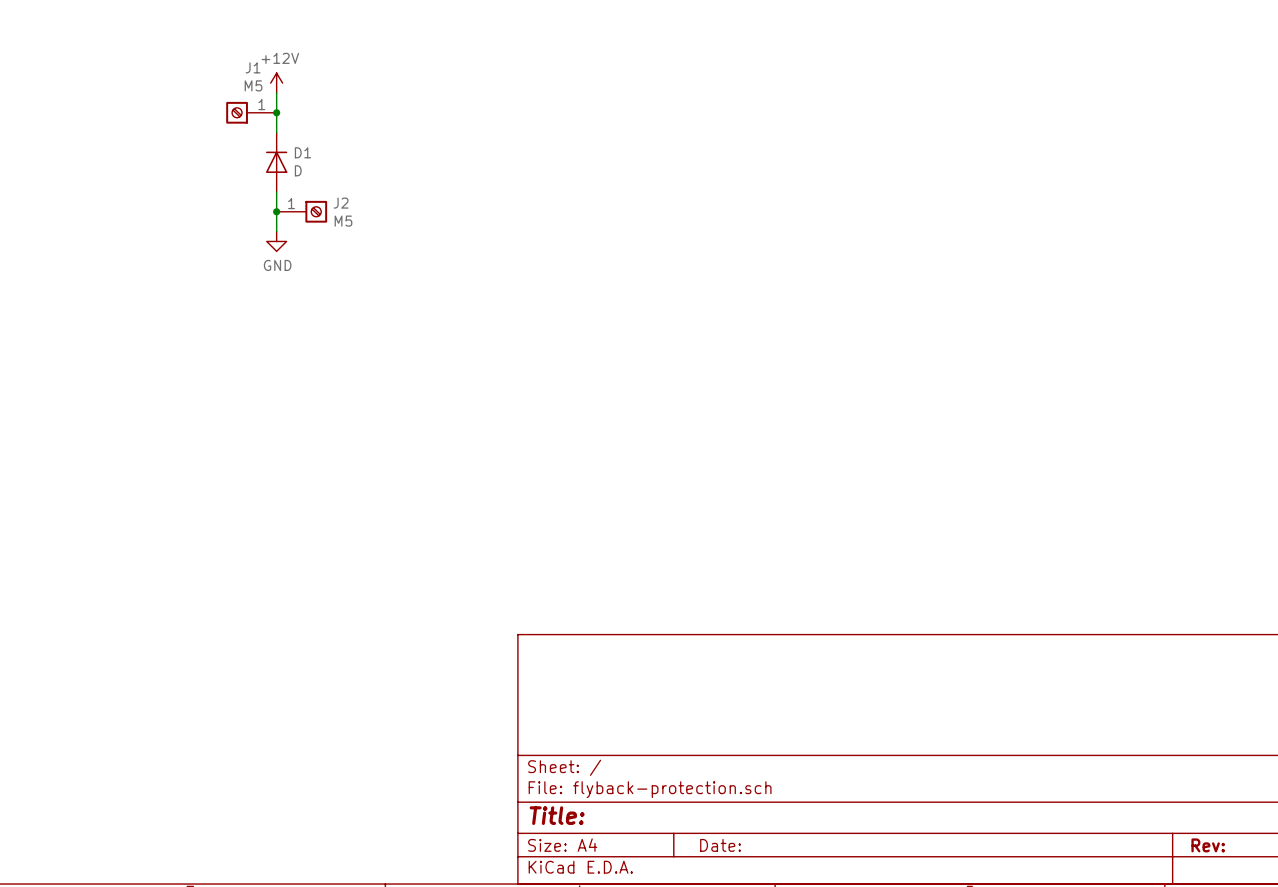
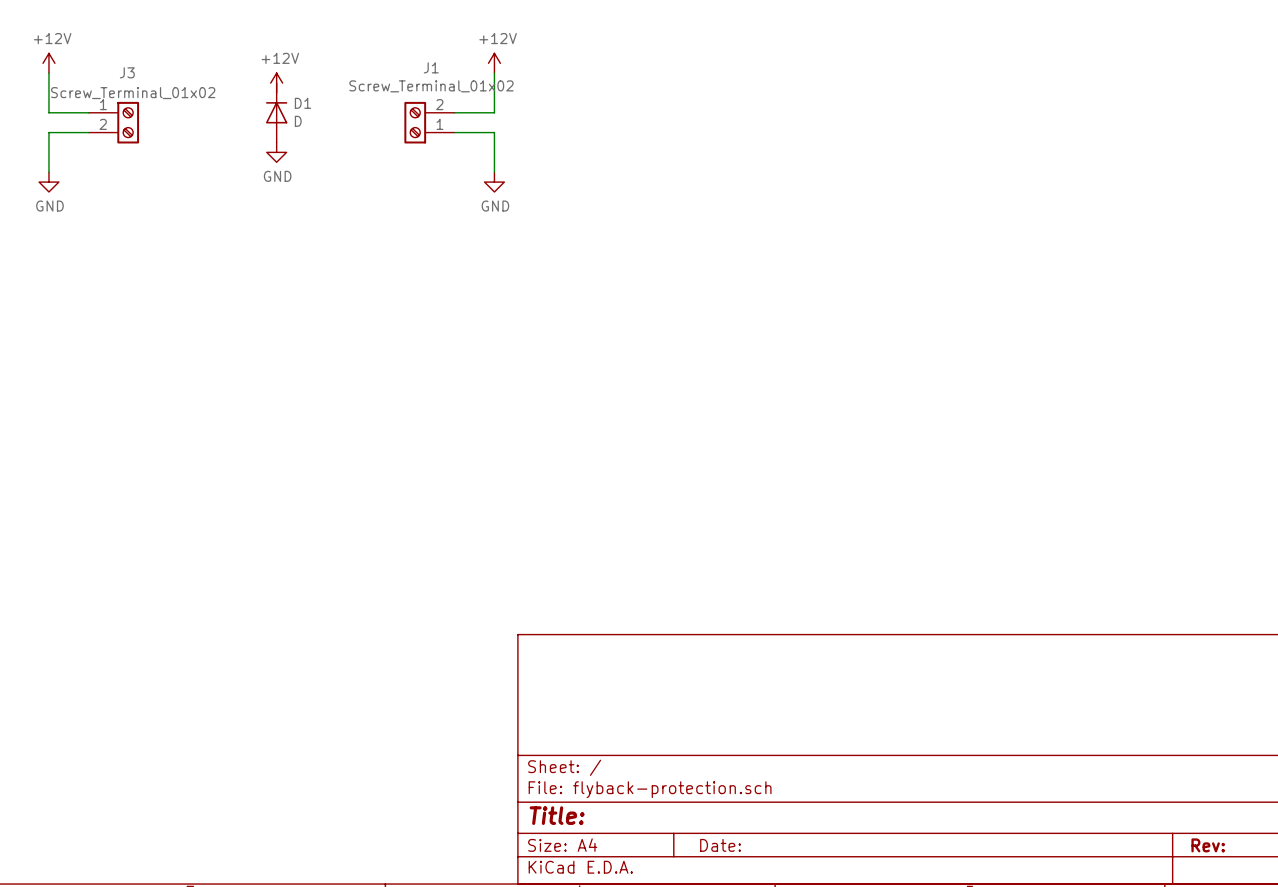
power symbol: none -> +12V (48, 63)
power symbol: none -> +12V (494, 63)
wire: none -> (48, 73) (48, 112) (88, 112)
wire: none -> (494, 73) (494, 112) (454, 112)
J1 value: M5 (253, 85) -> Screw_Terminal_01x02 (431, 86)
J1 symbol: [226, 101, 277, 124] -> [404, 101, 455, 144]
junction: (276, 112) -> none
J3: none -> Screw_Terminal_01x02 (113, 122)
wire: none -> (88, 132) (48, 132) (48, 172)
wire: none -> (454, 132) (494, 132) (494, 172)
D1 position: (276, 162) -> (276, 112)
power symbol: none -> GND (48, 182)
power symbol: none -> GND (494, 182)
wire: (276, 191) (276, 231) -> none
junction: (276, 211) -> none
J2: M5 (301, 211) -> none
power symbol position: GND (276, 241) -> GND (276, 152)

